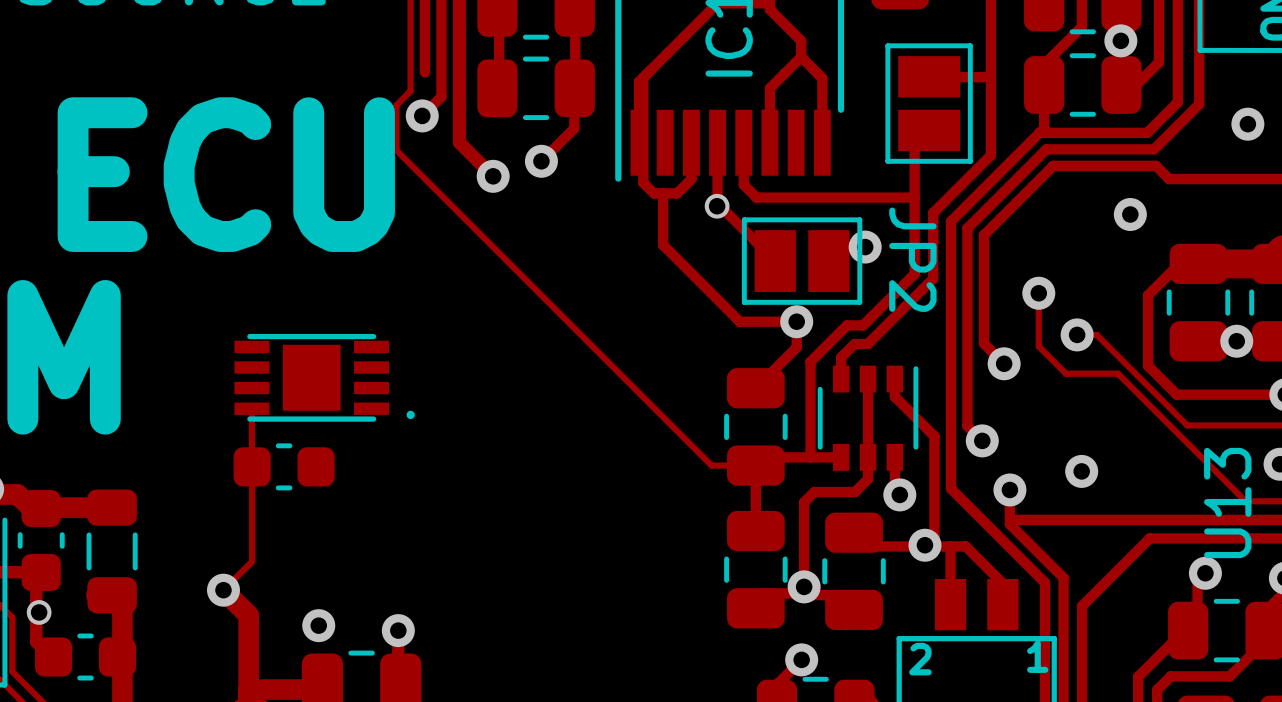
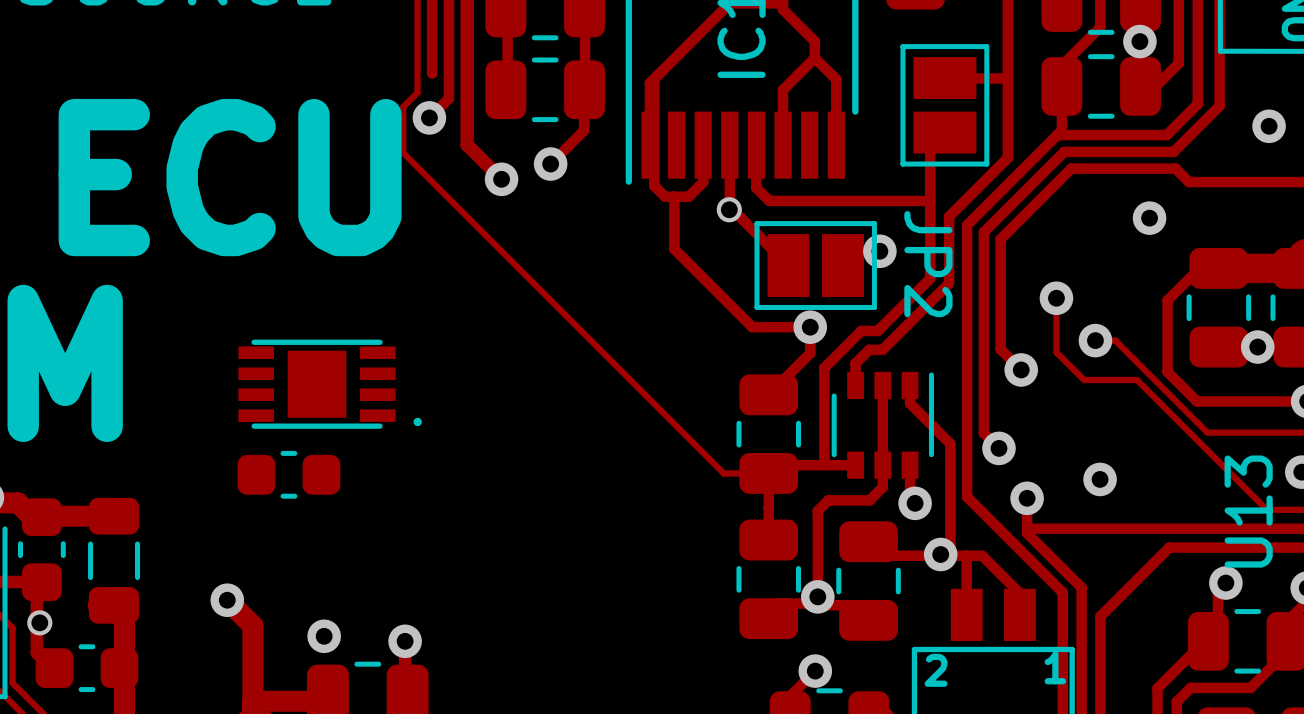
track: (251, 408) (251, 466) -> none
track: (252, 466) (252, 561) (223, 590) -> none

